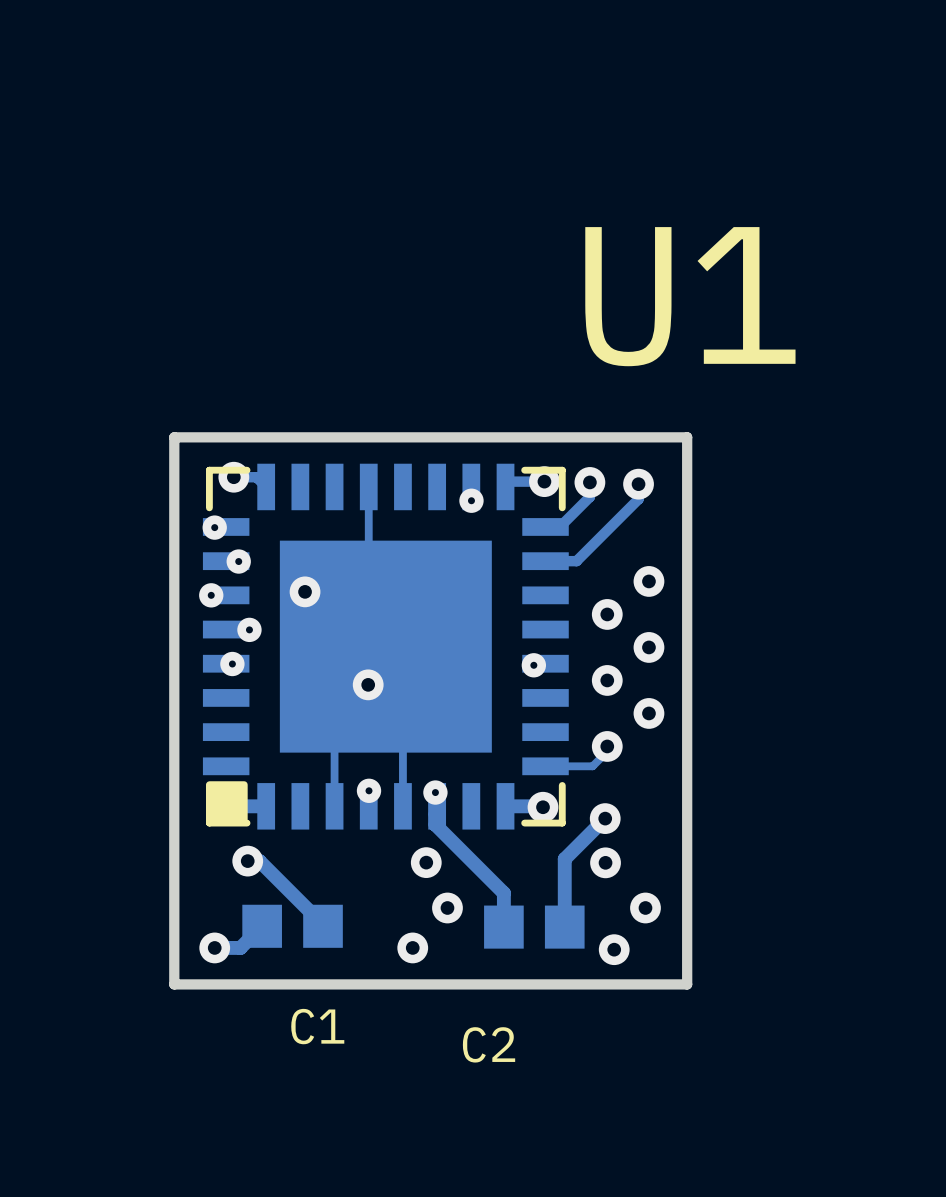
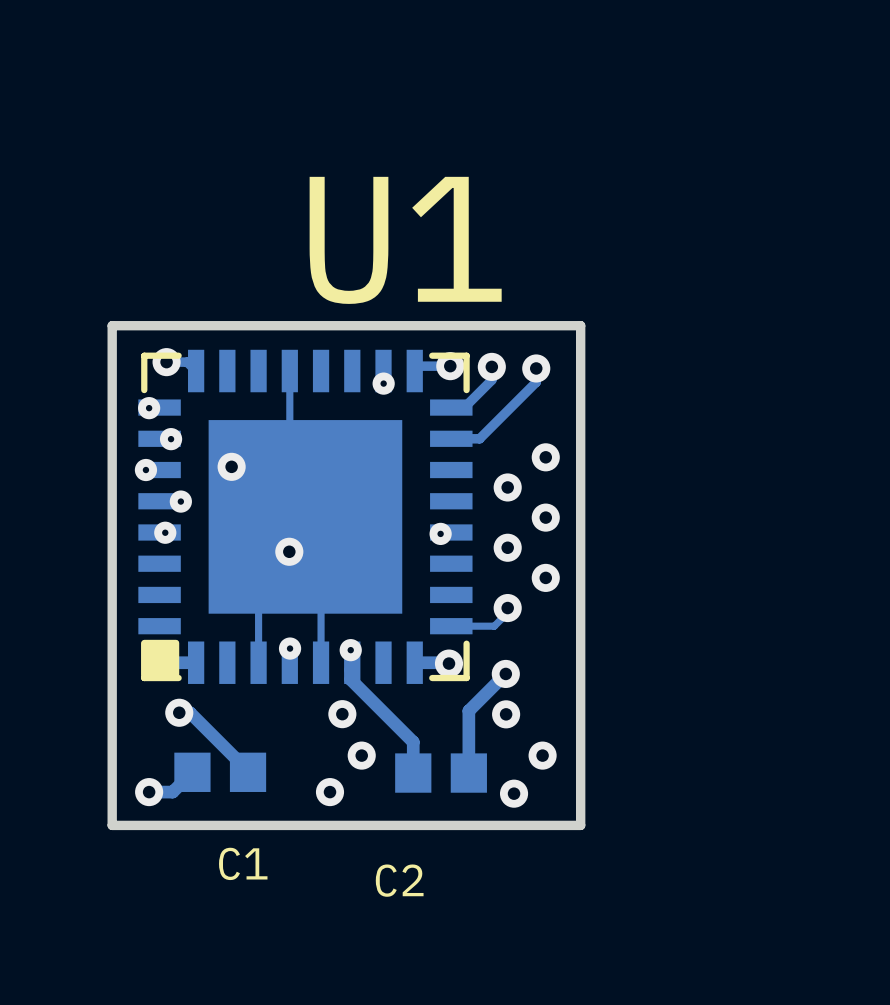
U1 name position: U1 (690, 296) -> U1 (405, 240)

